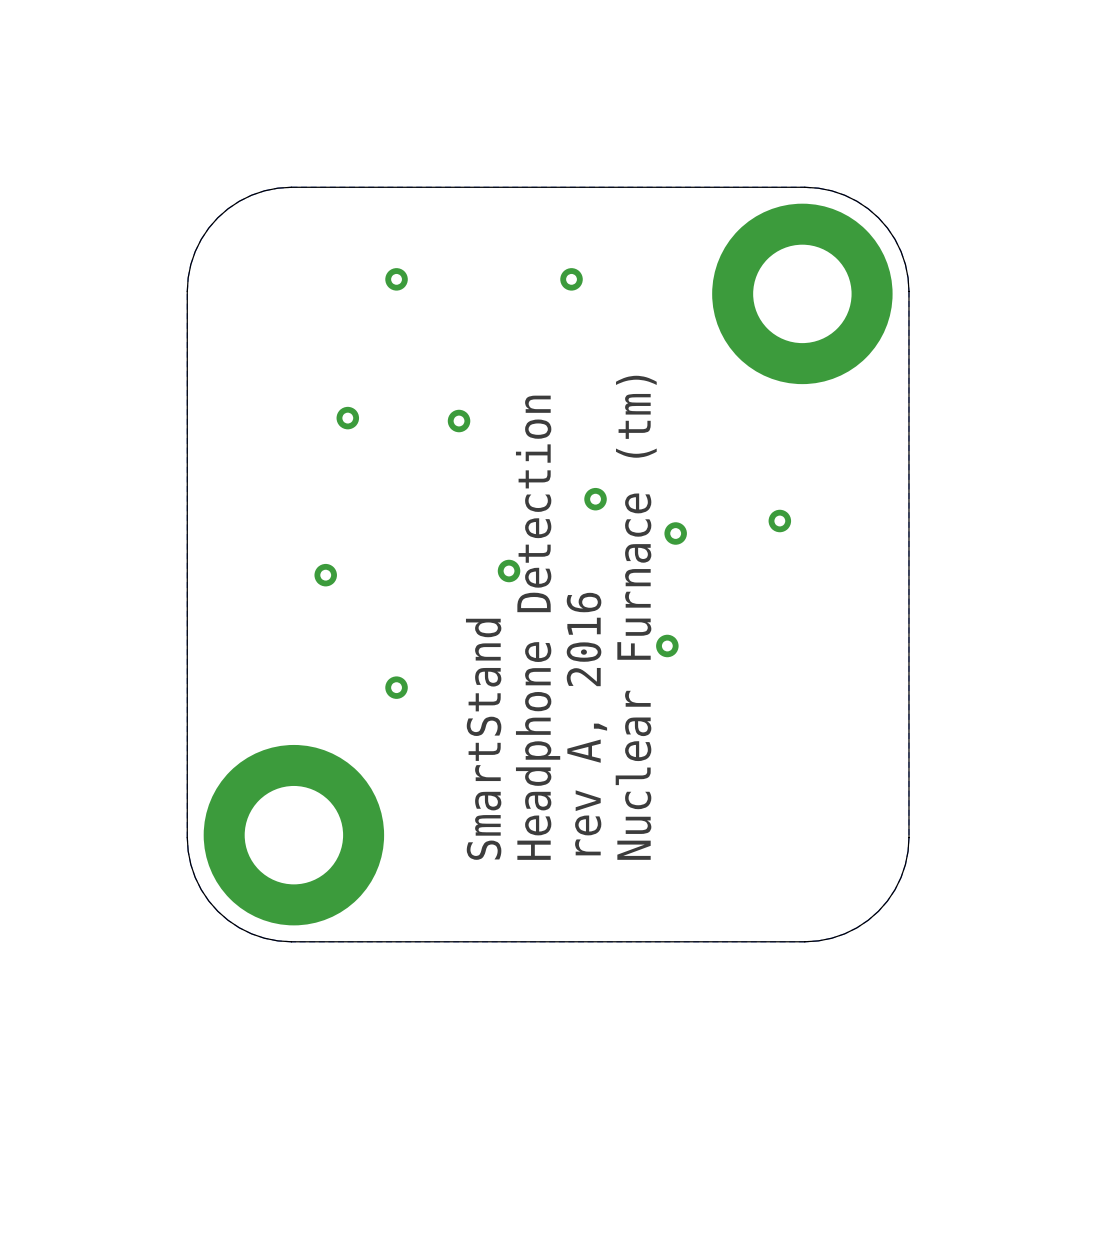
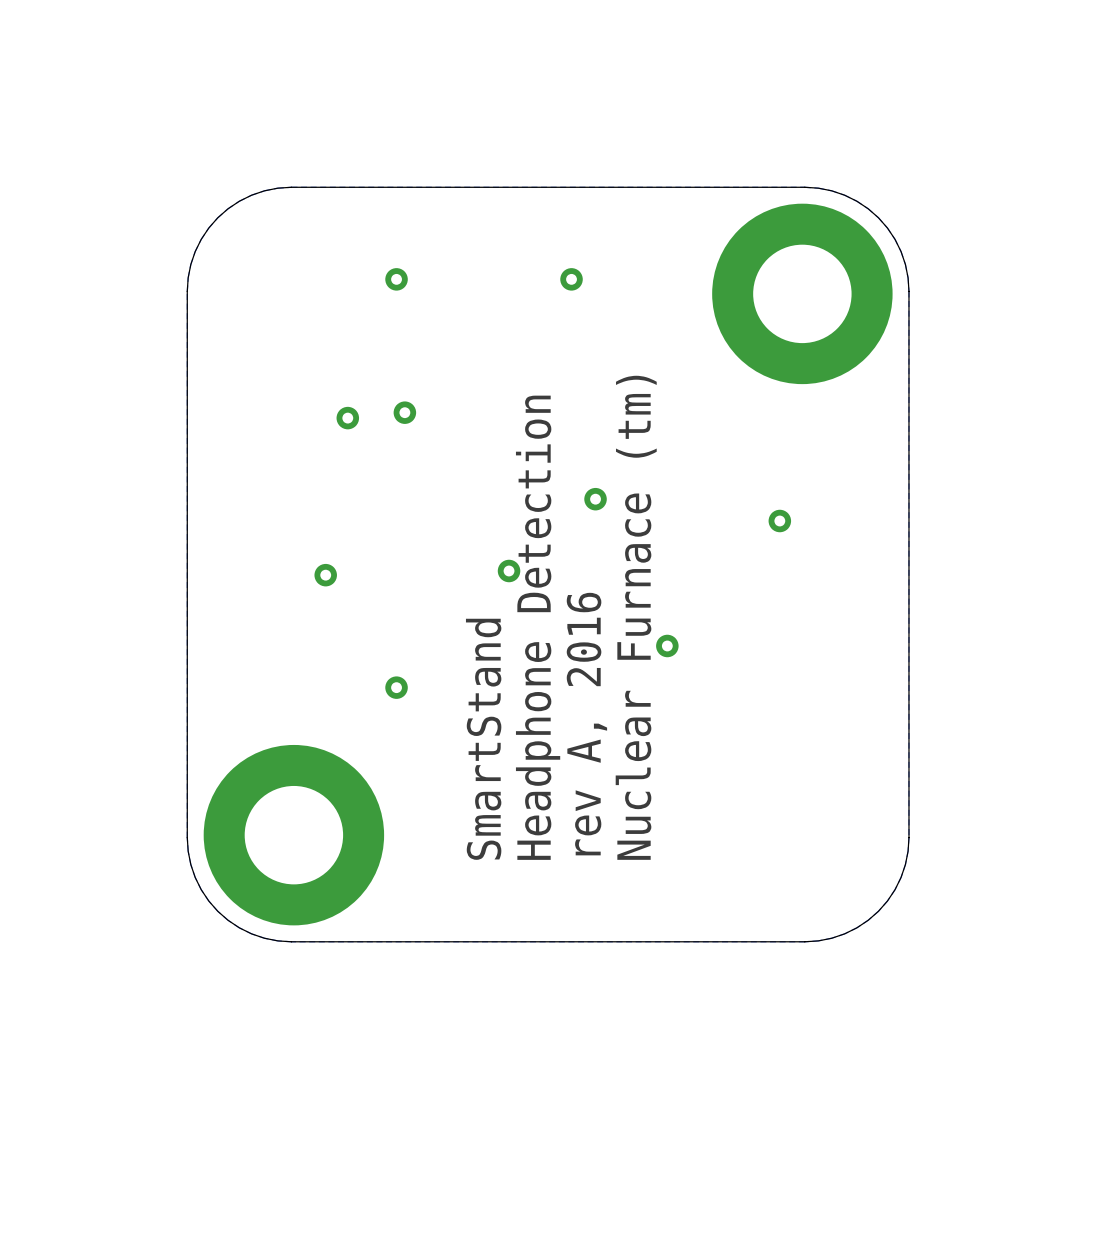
via position: (459, 421) -> (404, 412)
via: (675, 533) -> none

